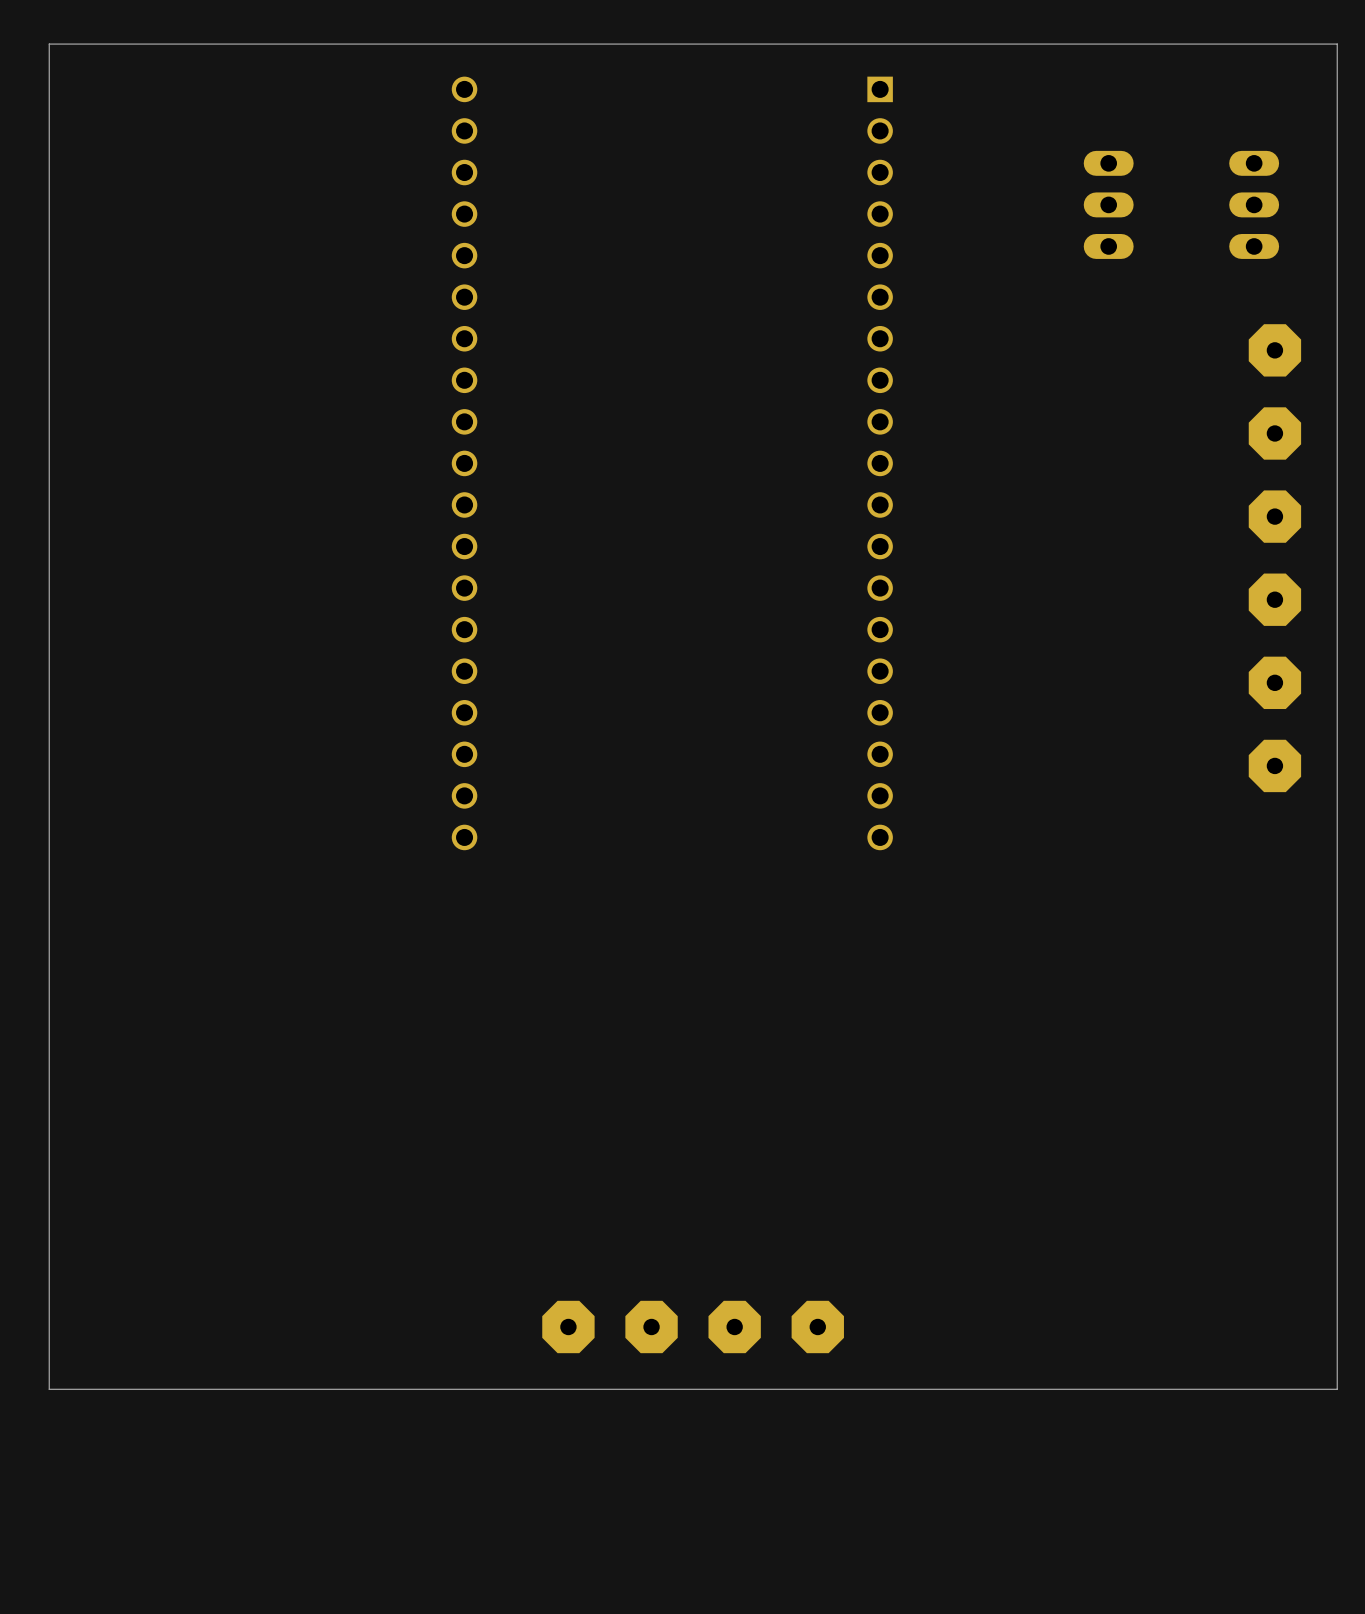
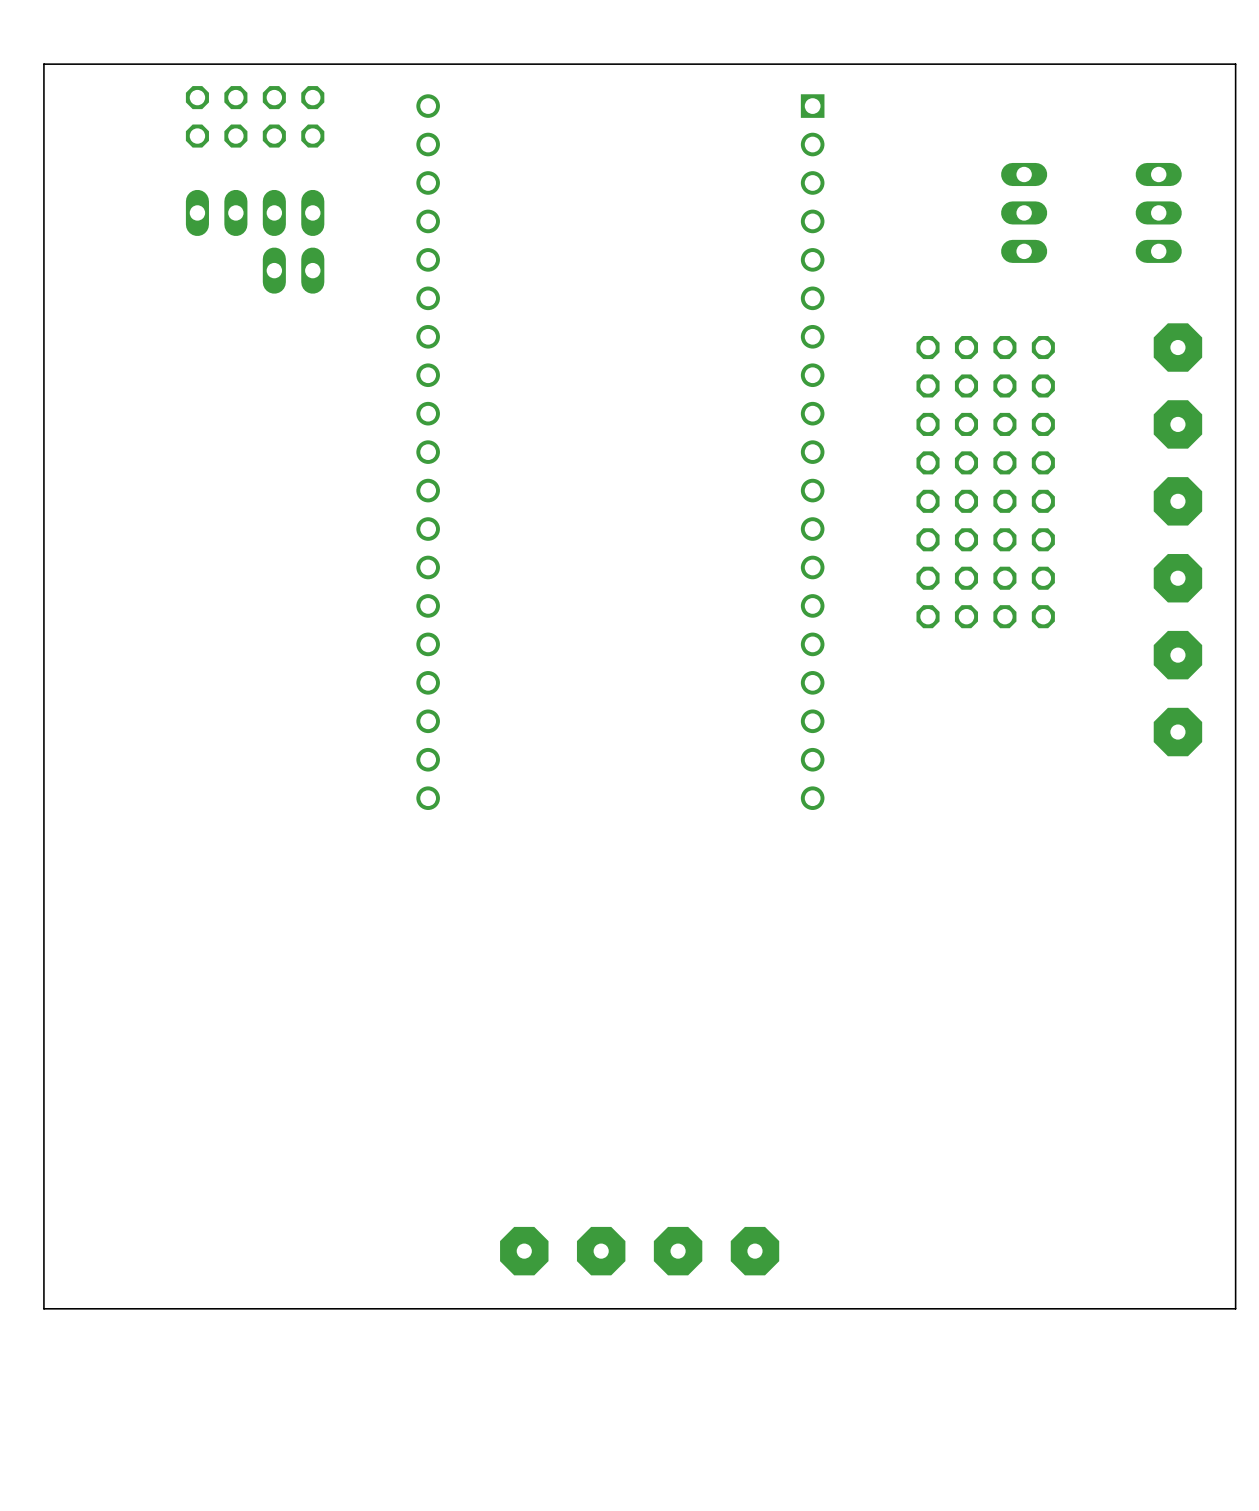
part: none -> (255, 116)
part: none -> (255, 212)
part: none -> (293, 270)
part: none -> (947, 482)
part: none -> (1024, 482)

